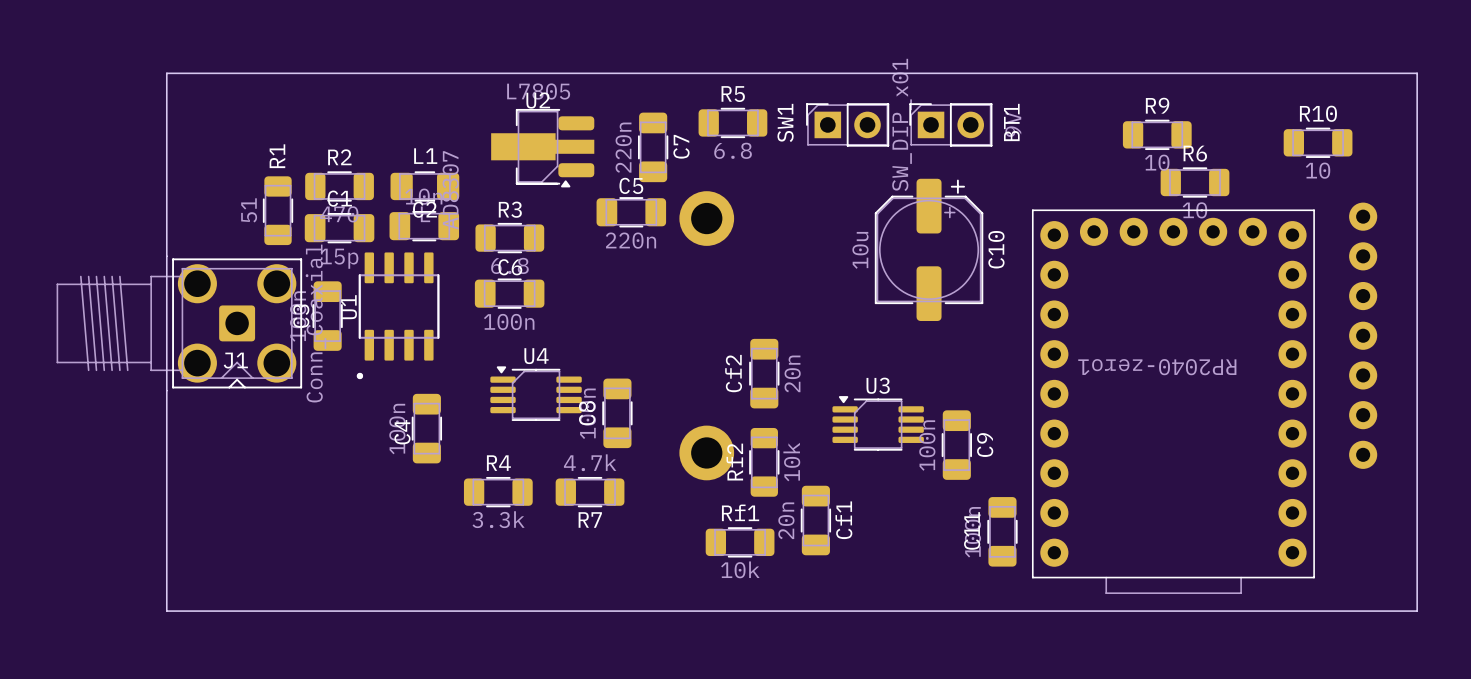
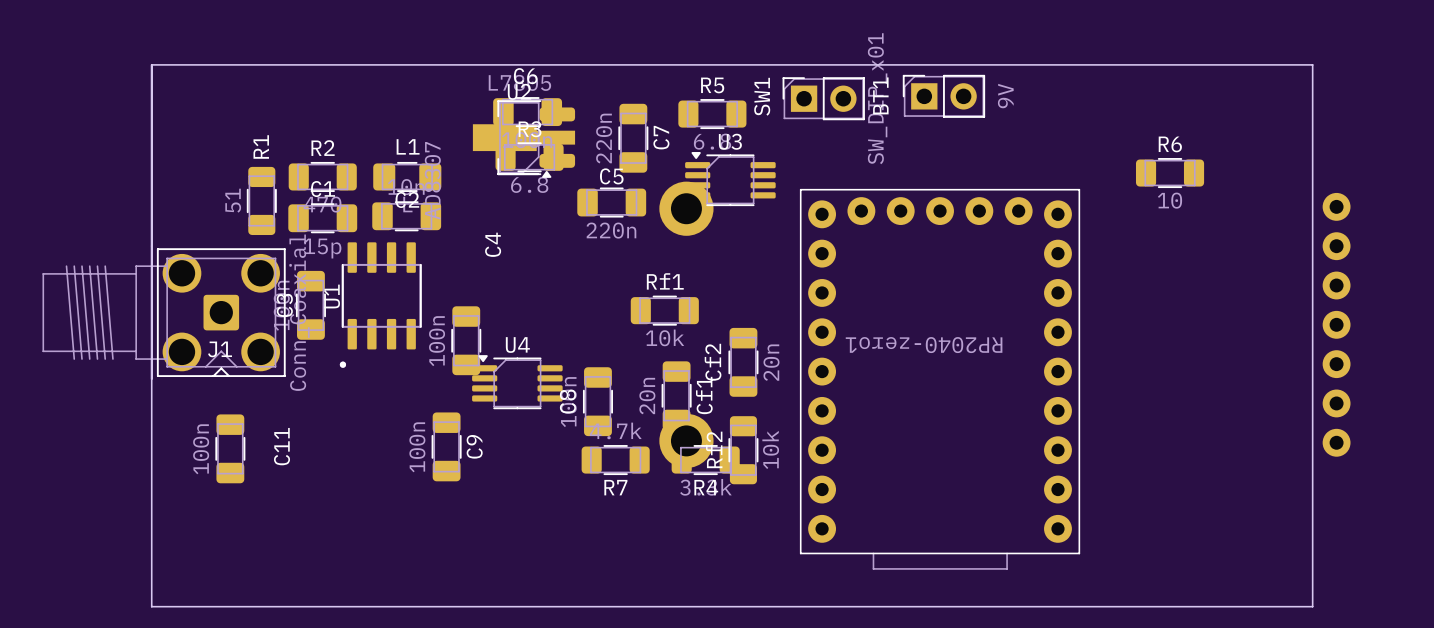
board edge: (1339, 73) (1417, 73) (1417, 611) (166, 611) (166, 390) -> (1312, 64) (1312, 606) (151, 606) (151, 64)
BT1 name position: BT1 (1011, 122) -> BT1 (880, 95)
SW1 position: (847, 124) -> (823, 98)
BT1 position: (950, 124) -> (943, 96)
R9: 10 (1157, 134) -> none
R10: 10 (1318, 142) -> none
R3 position: (509, 238) -> (529, 157)
C10: 10u (929, 249) -> none
C6 name position: C6 (510, 267) -> C6 (525, 76)
C6 position: (509, 293) -> (527, 112)
RP2040-zero1 position: (1173, 401) -> (940, 379)
U3 position: (878, 423) -> (730, 179)
C4 position: (426, 428) -> (466, 340)
C4 name position: C4 (402, 432) -> C4 (493, 244)
C9 position: (956, 445) -> (446, 446)
R4 name position: R4 (498, 463) -> R4 (706, 487)
R4 position: (498, 492) -> (705, 460)
R7 position: (590, 492) -> (615, 460)
Cf1 position: (815, 520) -> (676, 395)
C11 name position: C11 (972, 530) -> C11 (282, 446)
C11 position: (1002, 531) -> (230, 448)
Rf1 position: (740, 542) -> (664, 310)

